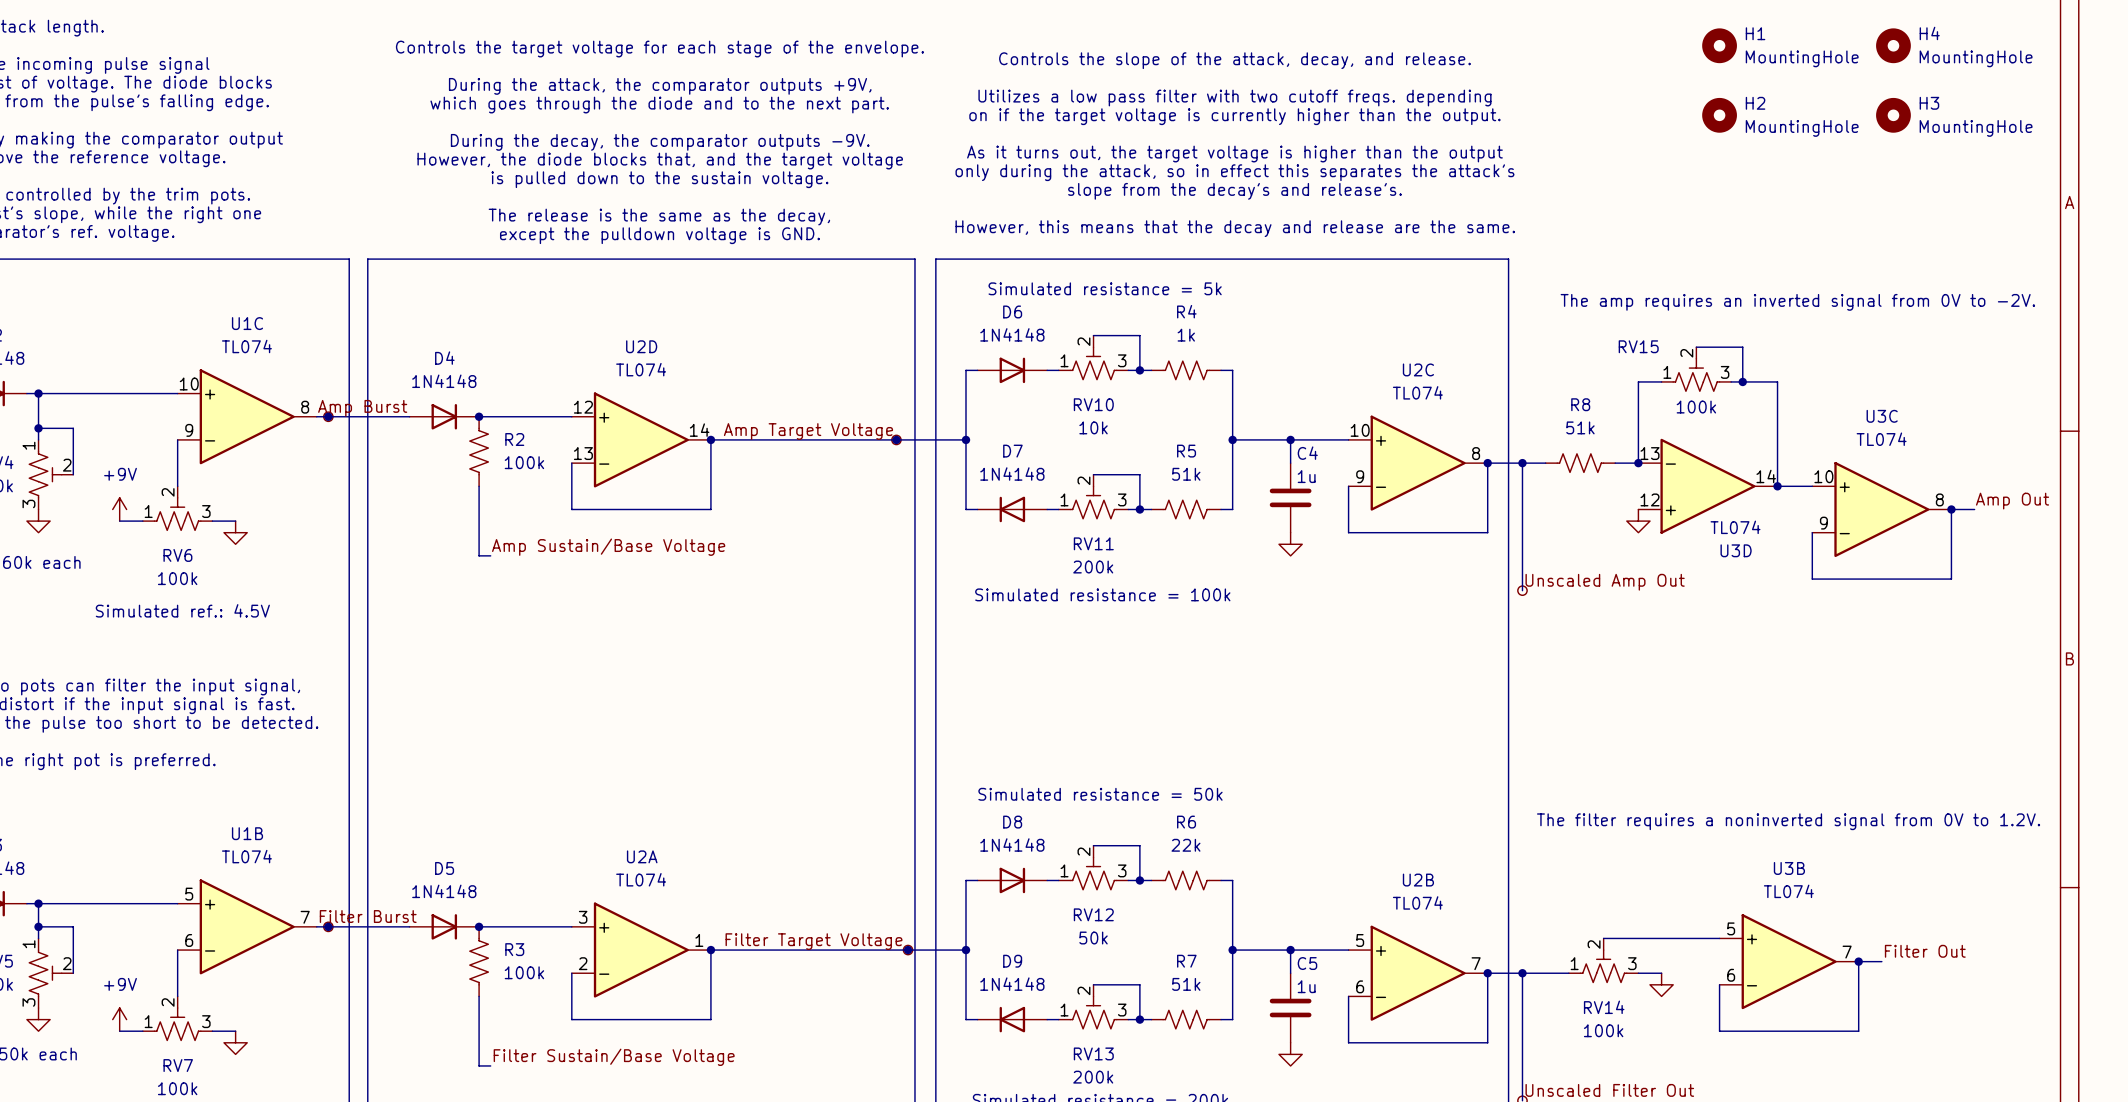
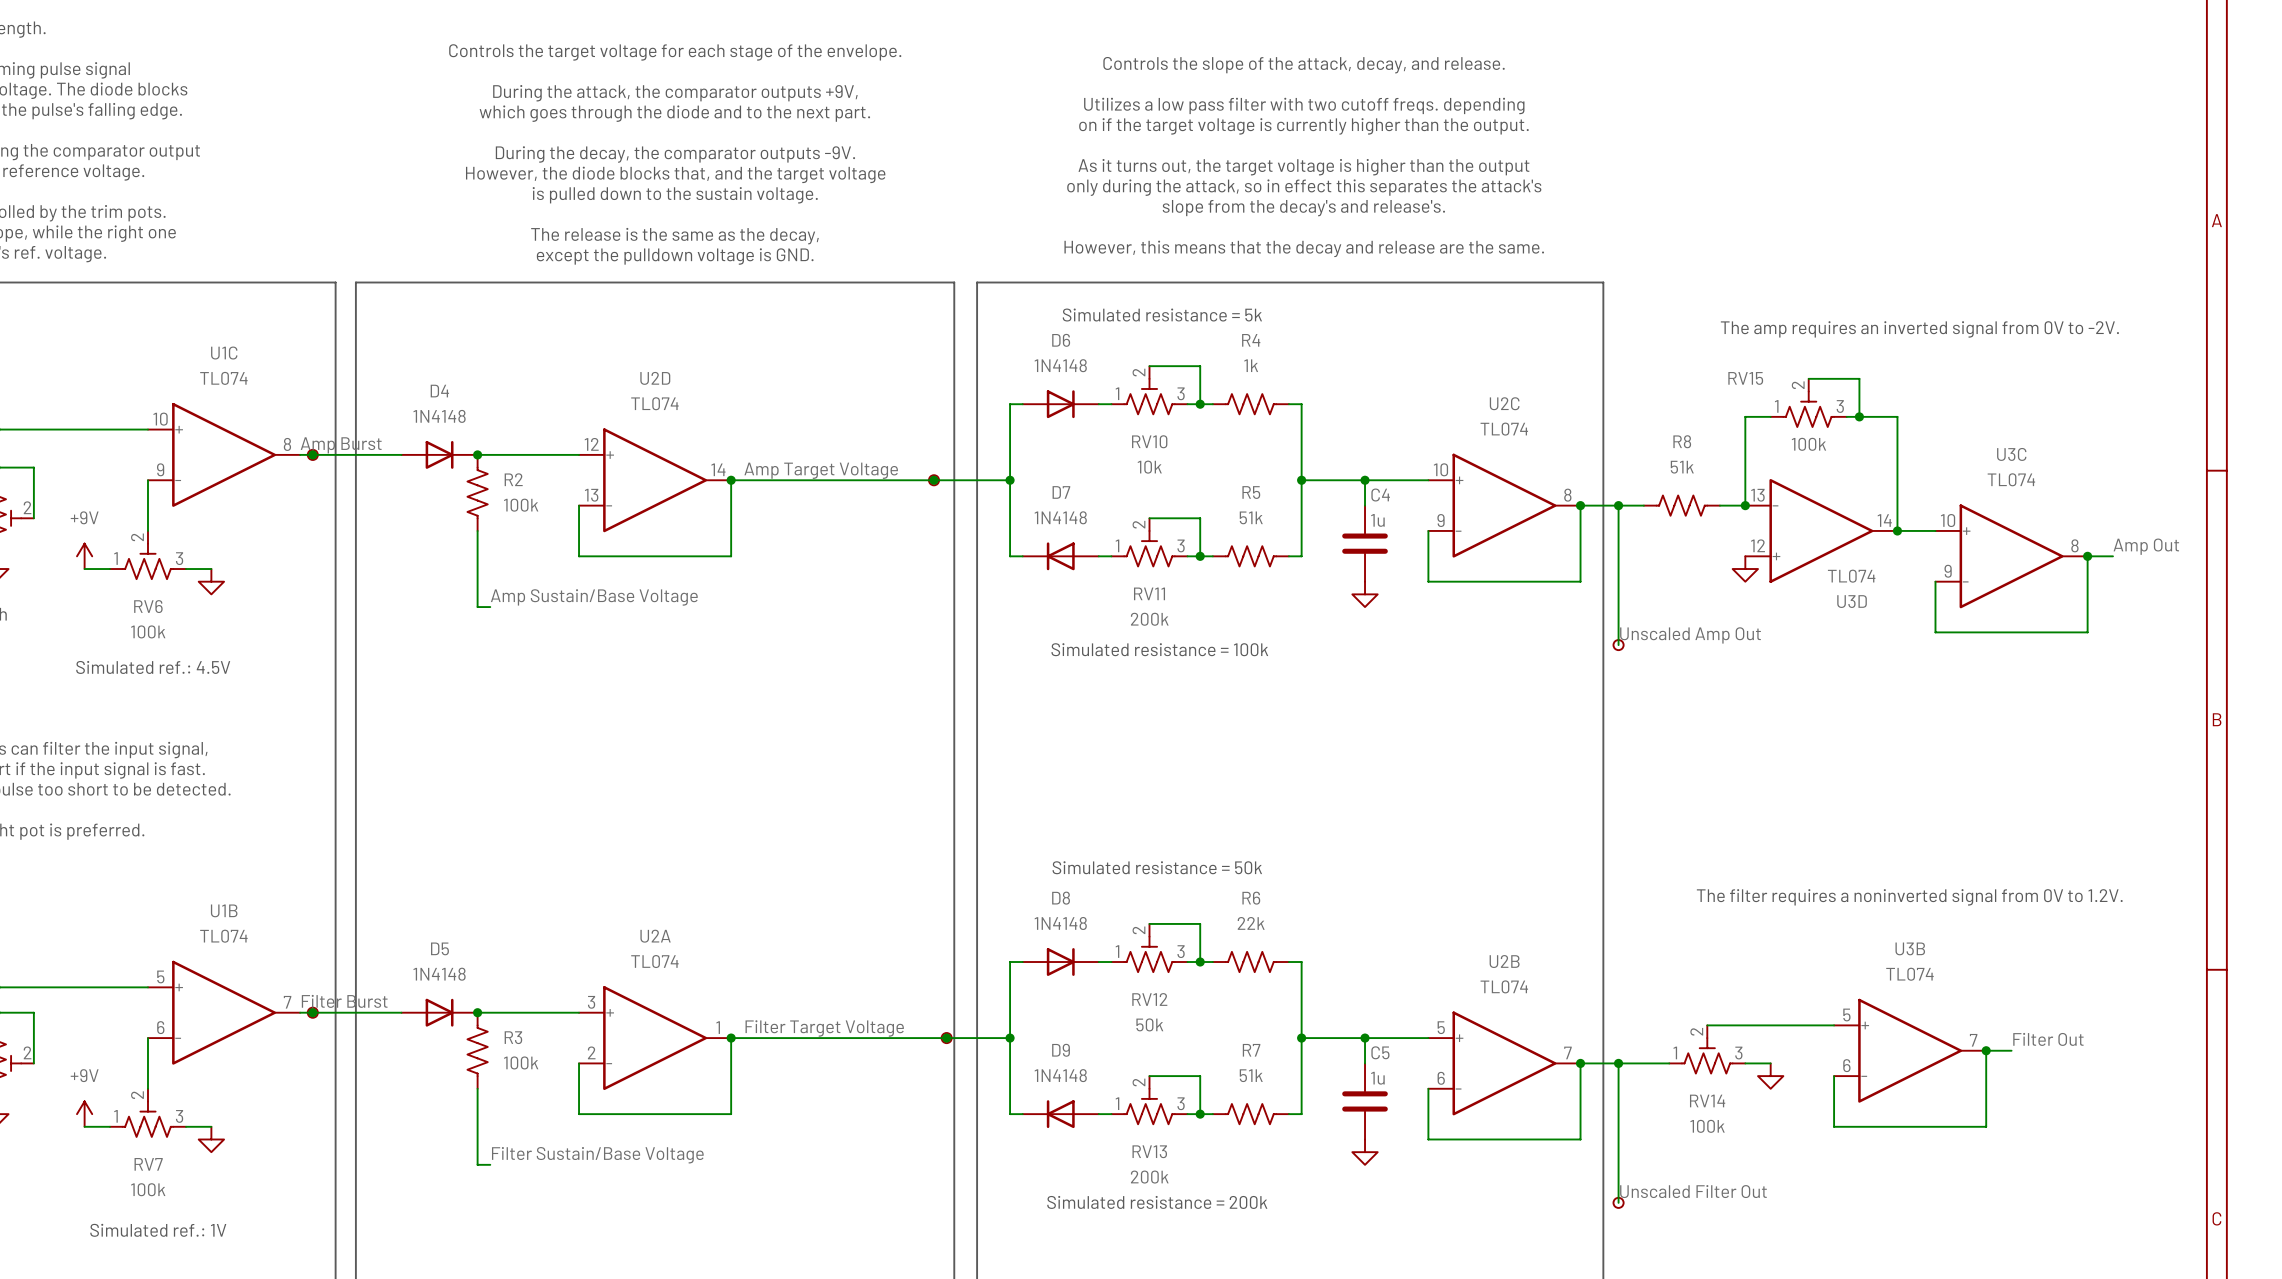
H1: MountingHole (1719, 45) -> none
H4: MountingHole (1893, 45) -> none
H2: MountingHole (1719, 115) -> none
H3: MountingHole (1893, 115) -> none

